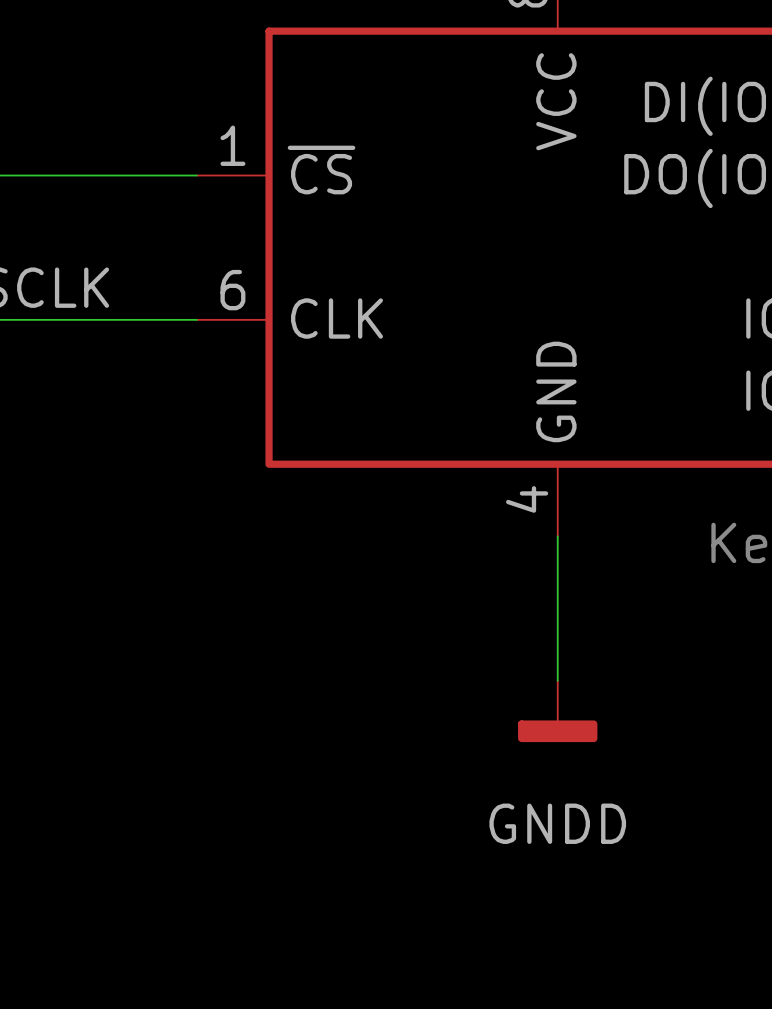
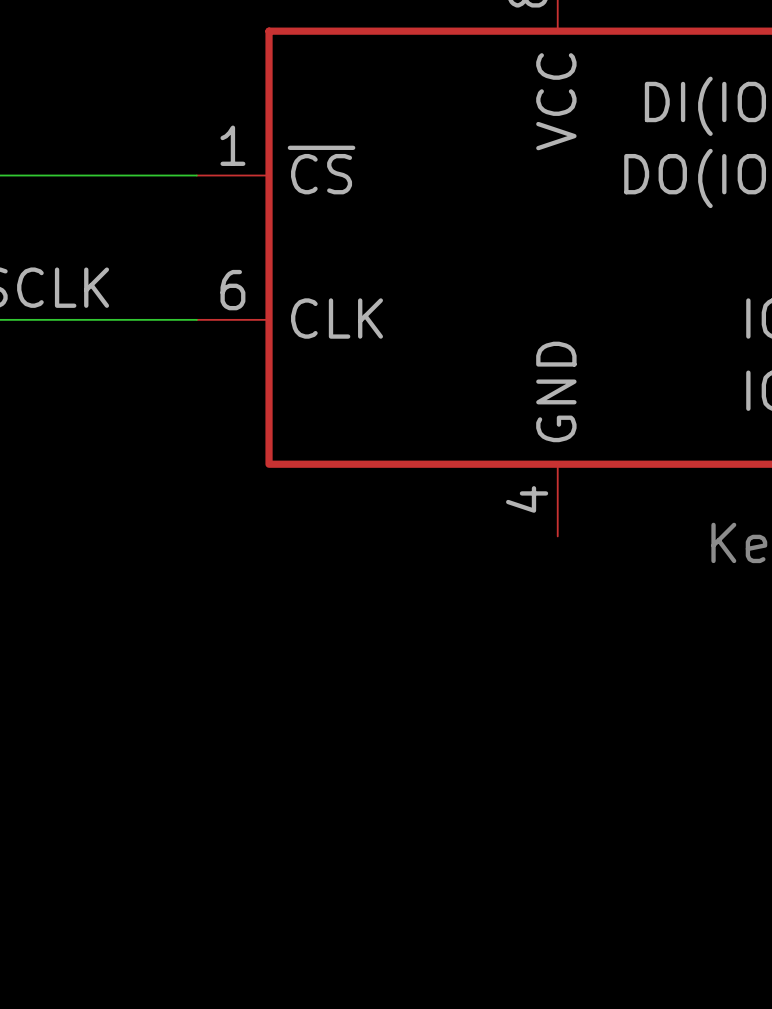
wire: (557, 536) (557, 680) -> none
power symbol: GNDD (557, 711) -> none

